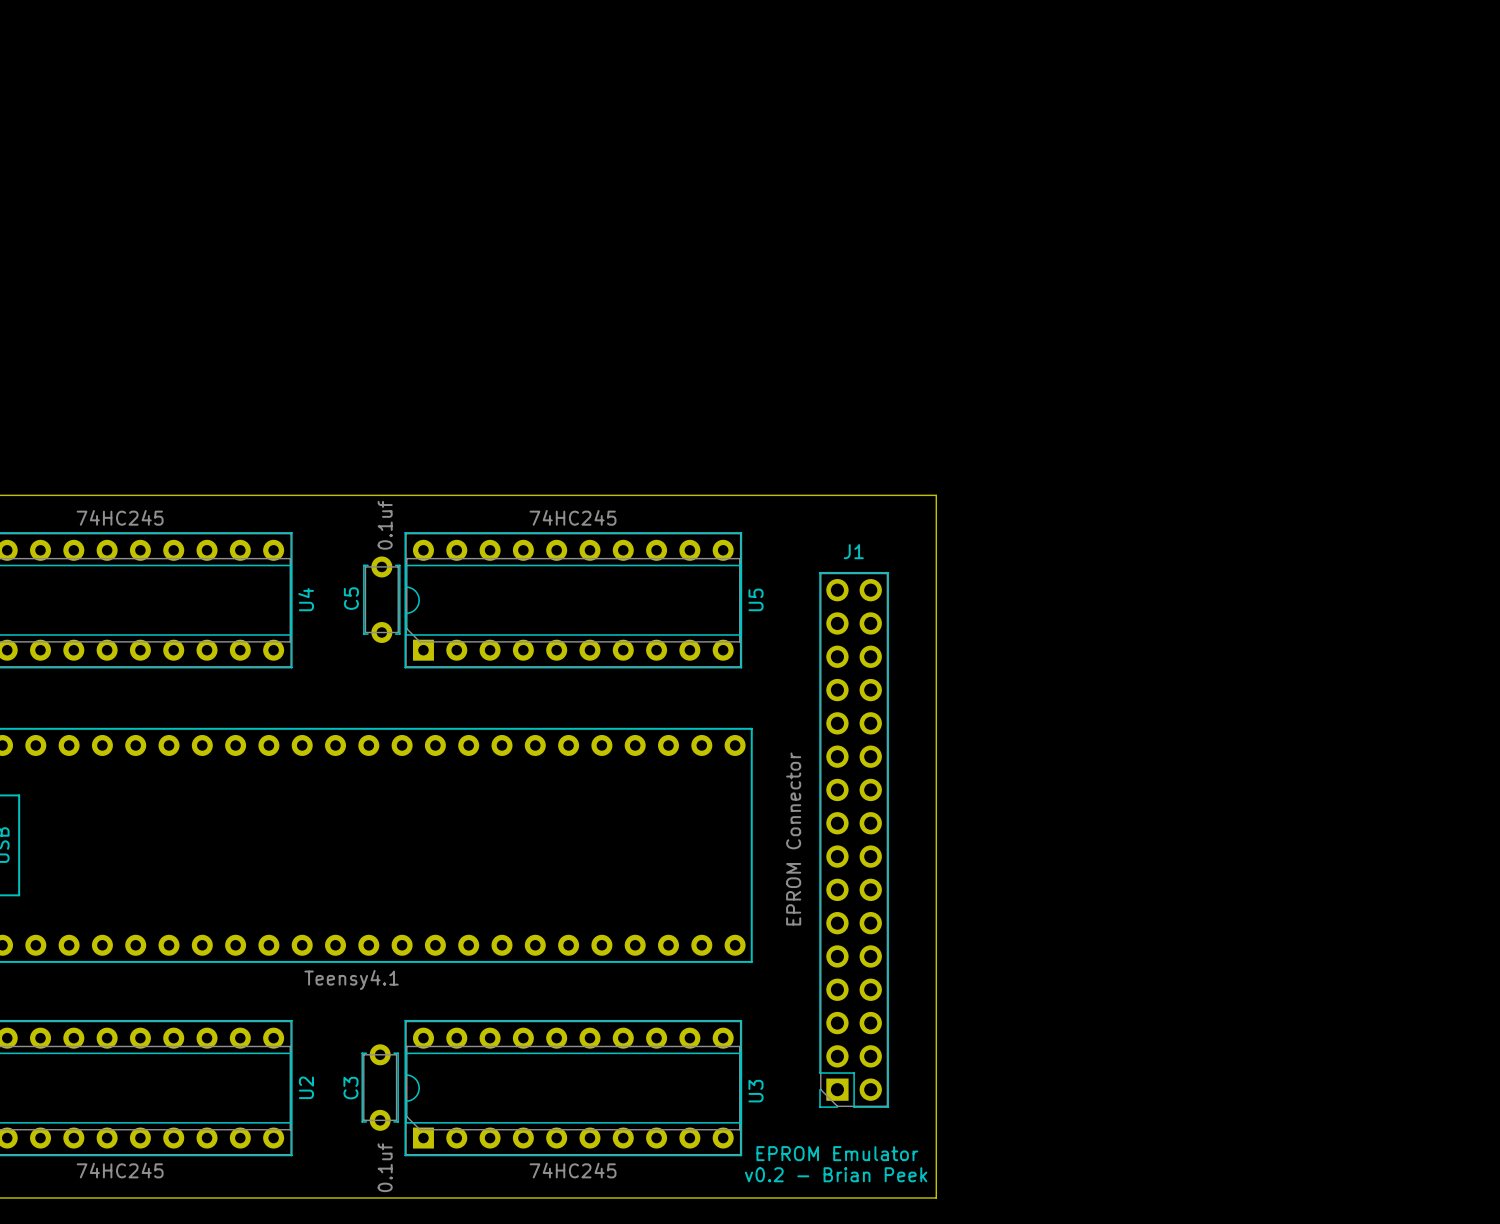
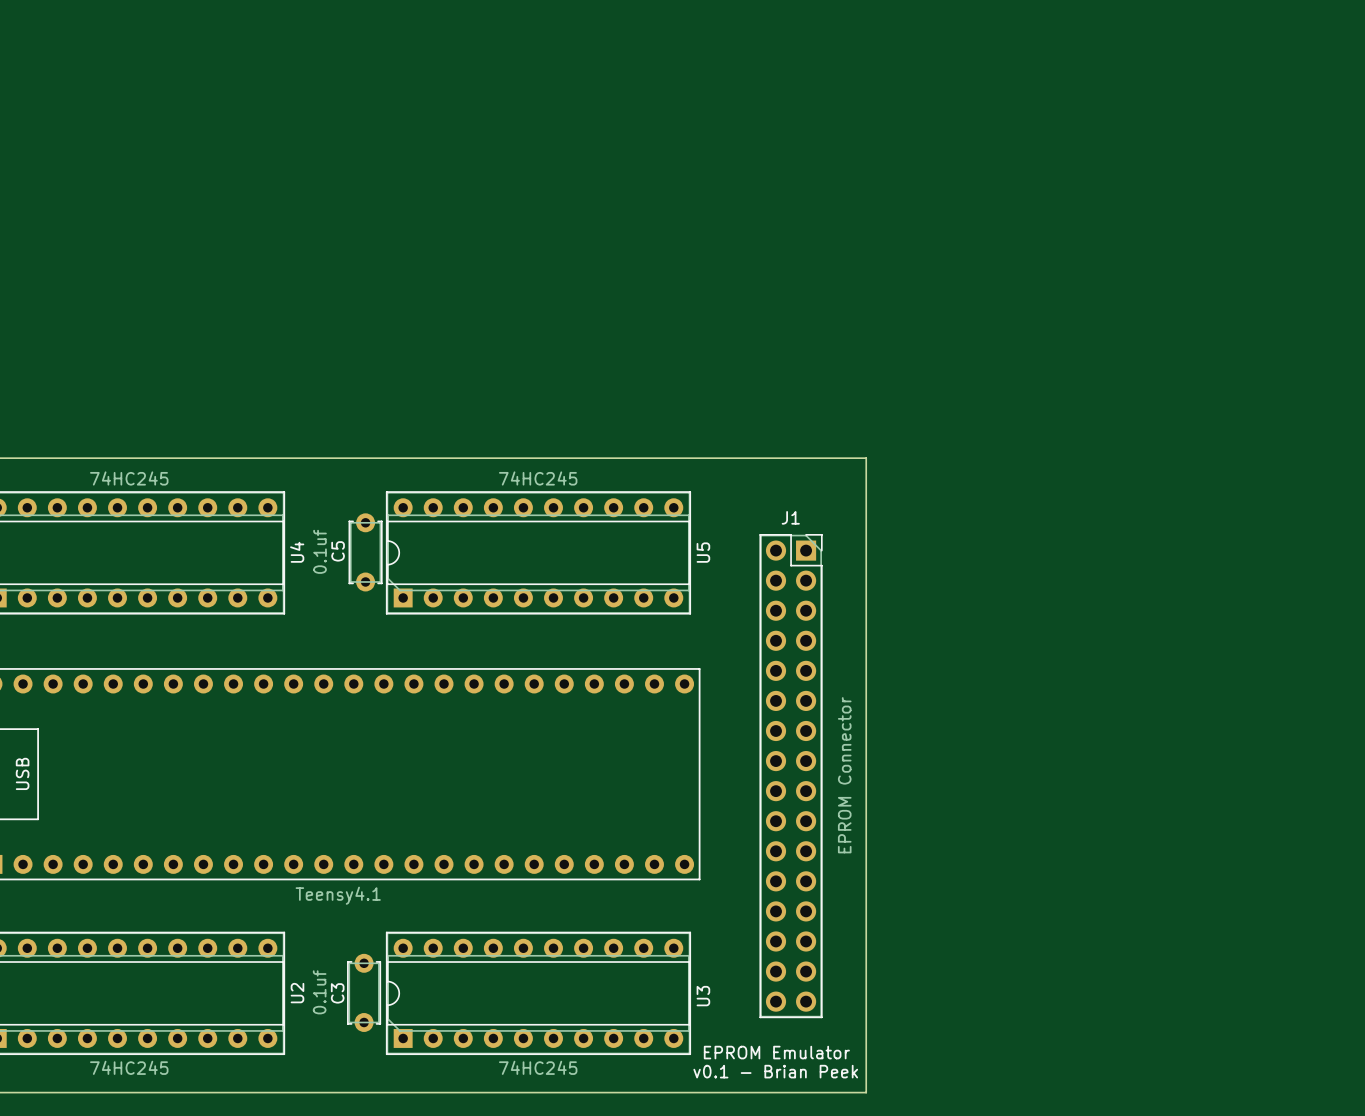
C5 value position: 0.1uf (385, 525) -> 0.1uf (320, 551)
J1 rotation: 0° (854, 839) -> 180° (791, 776)
C3 value position: 0.1uf (385, 1167) -> 0.1uf (319, 992)
text: v0.2 - Brian Peek (836, 1174) -> v0.1 - Brian Peek (775, 1071)

